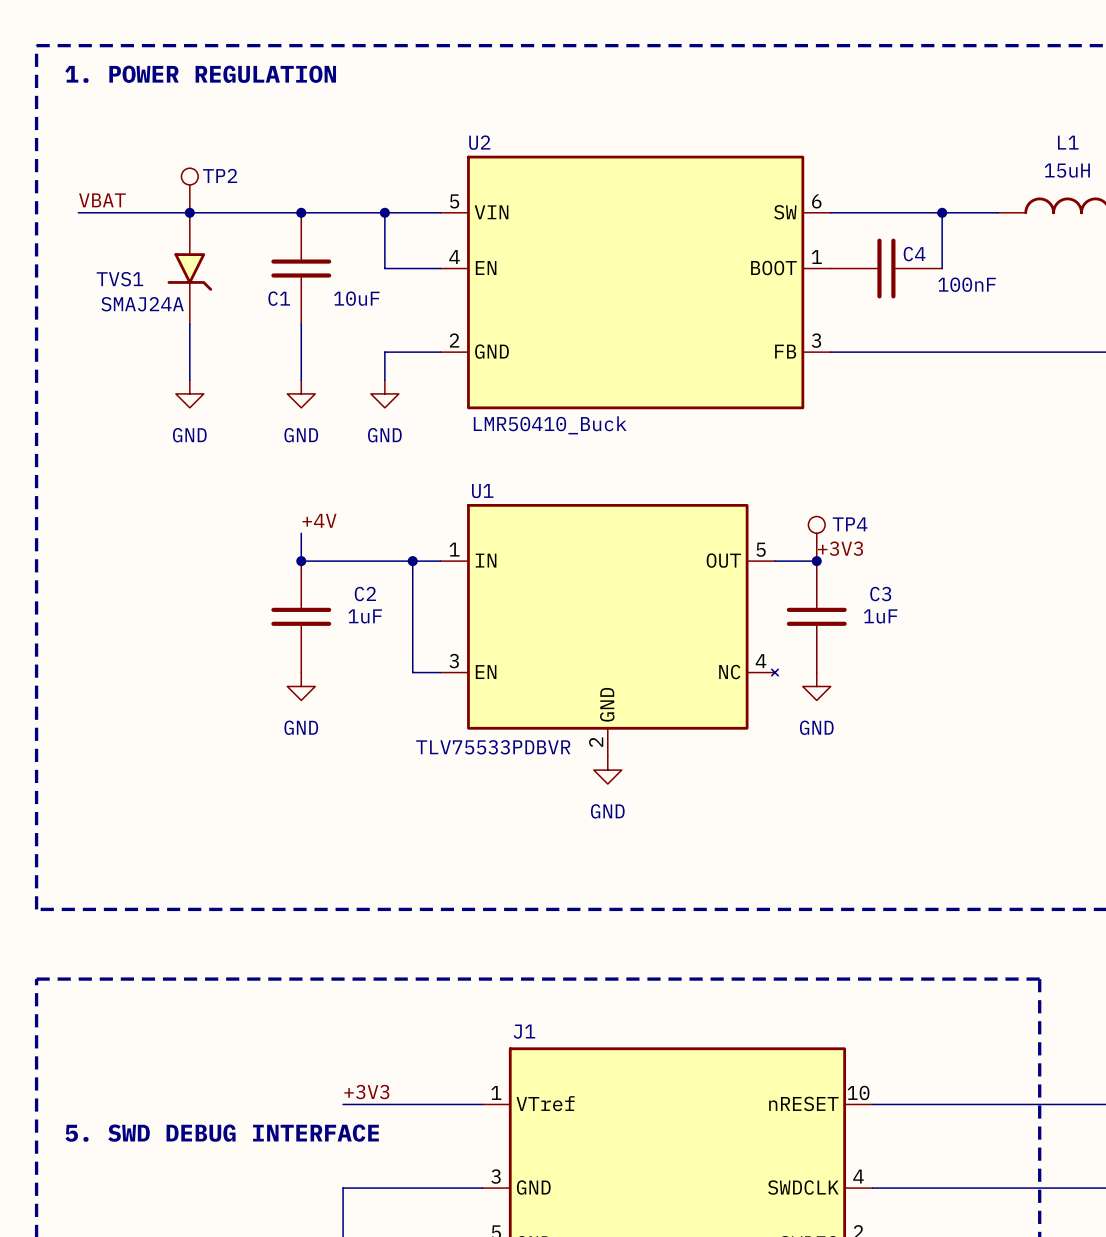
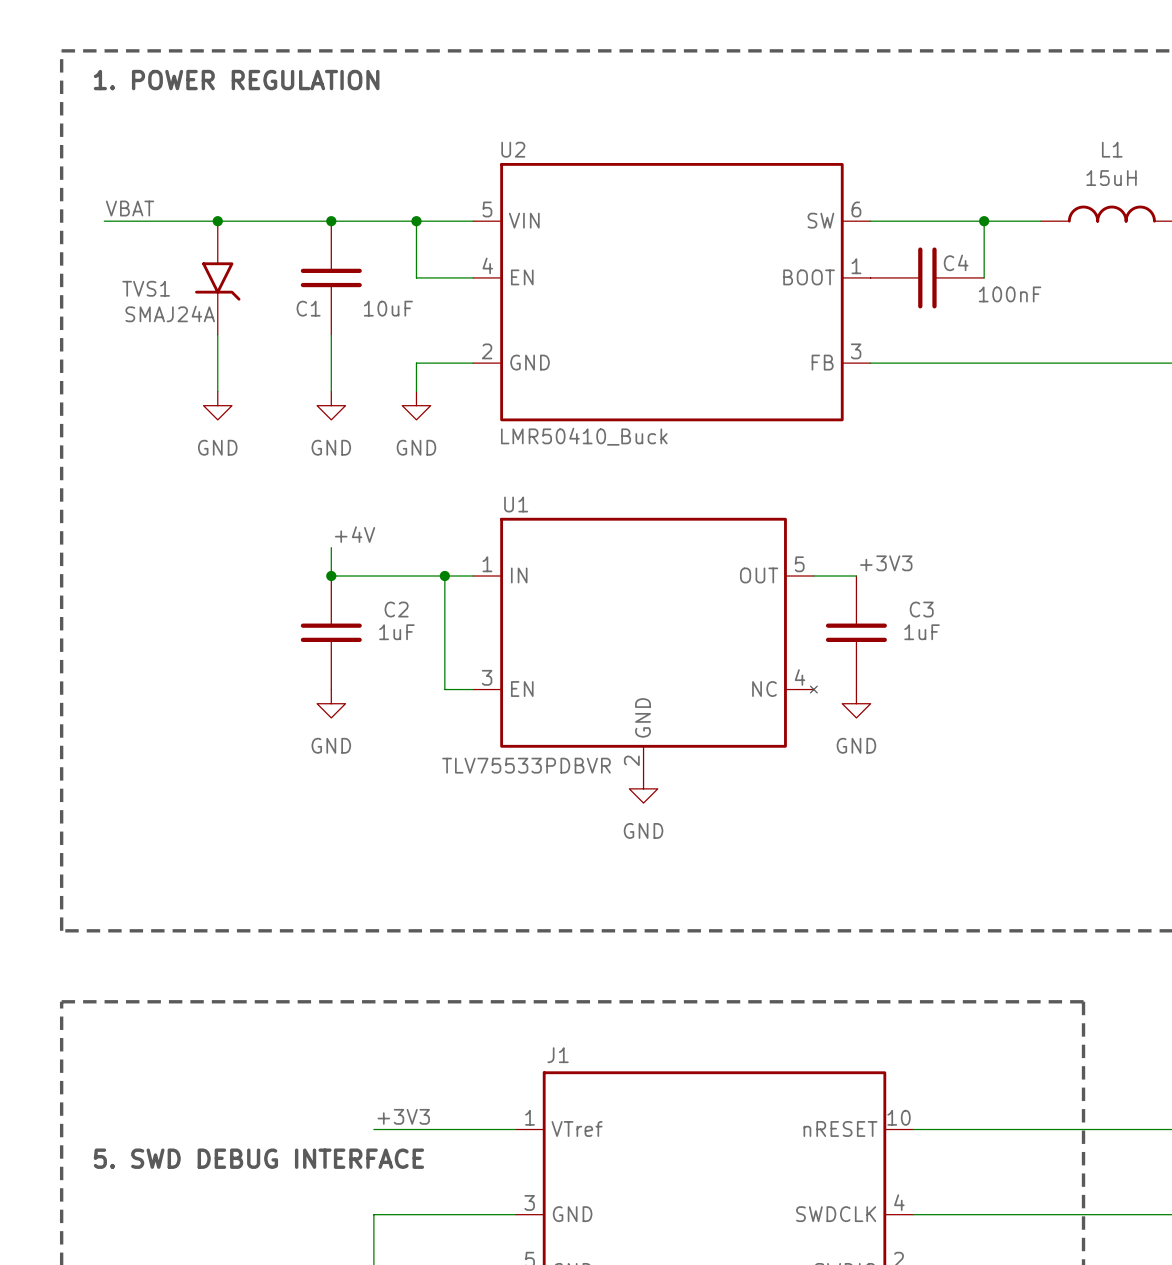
TP2: (189, 190) -> none
TP4: (816, 538) -> none
junction: (816, 561) -> none

